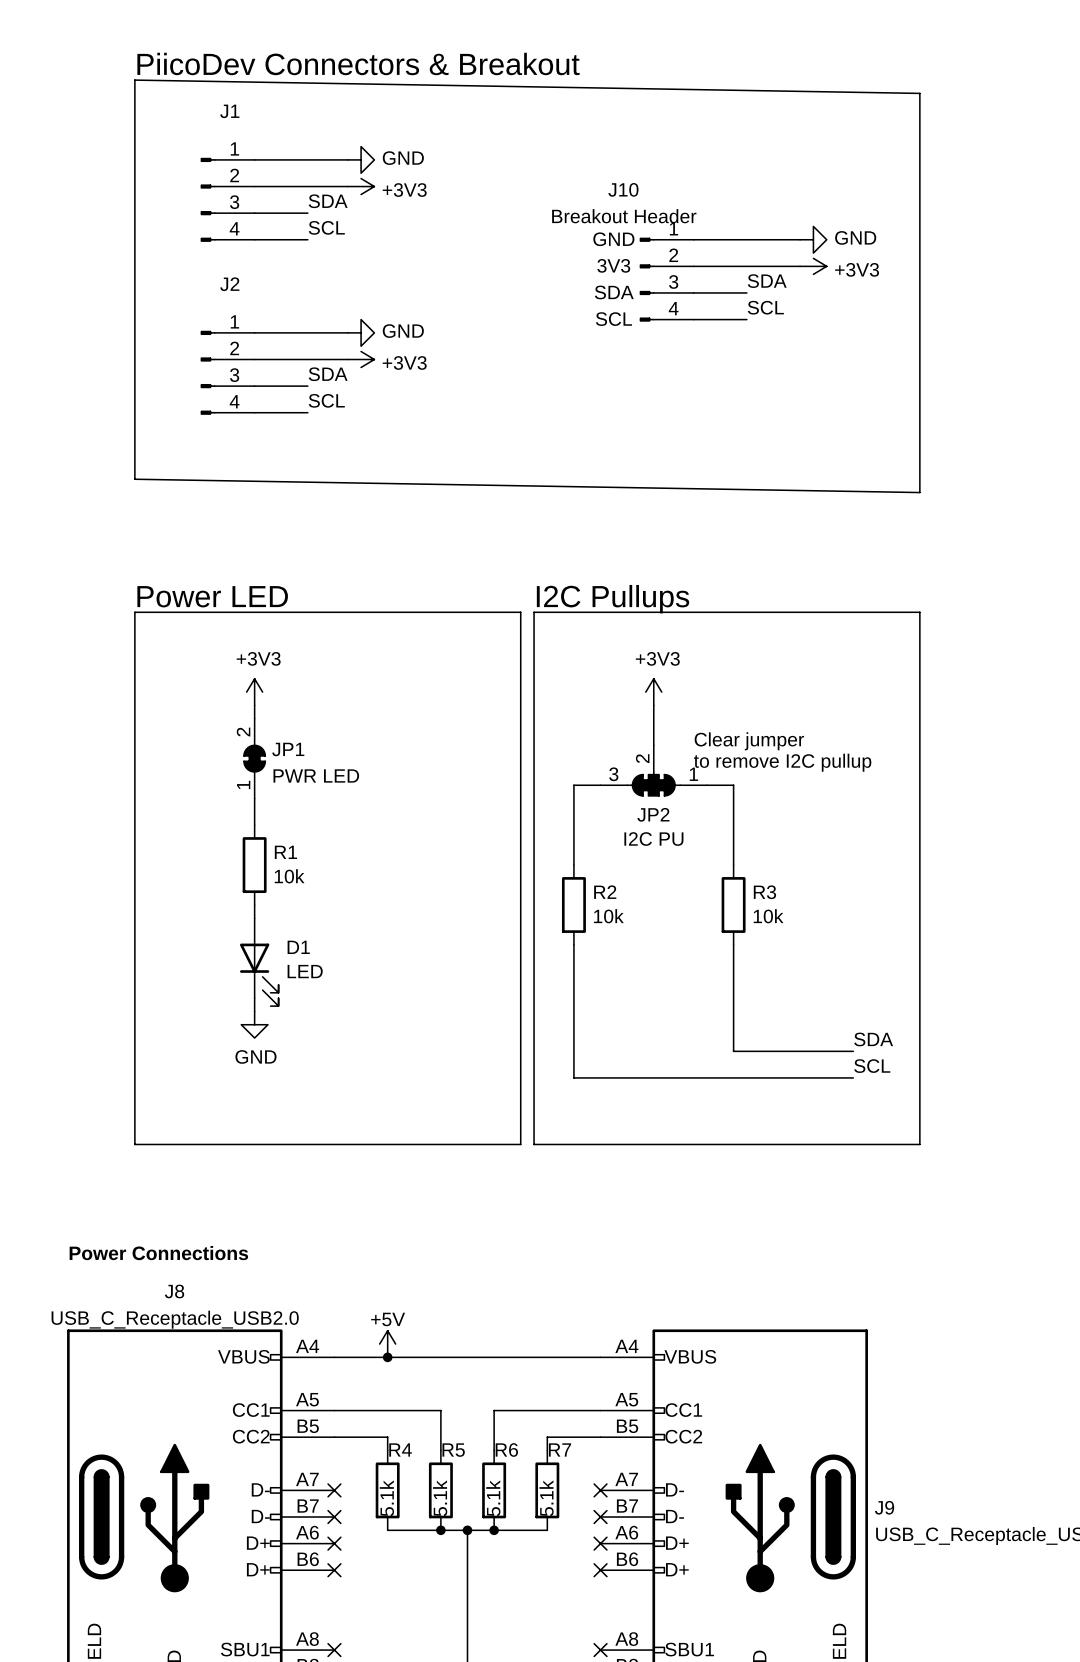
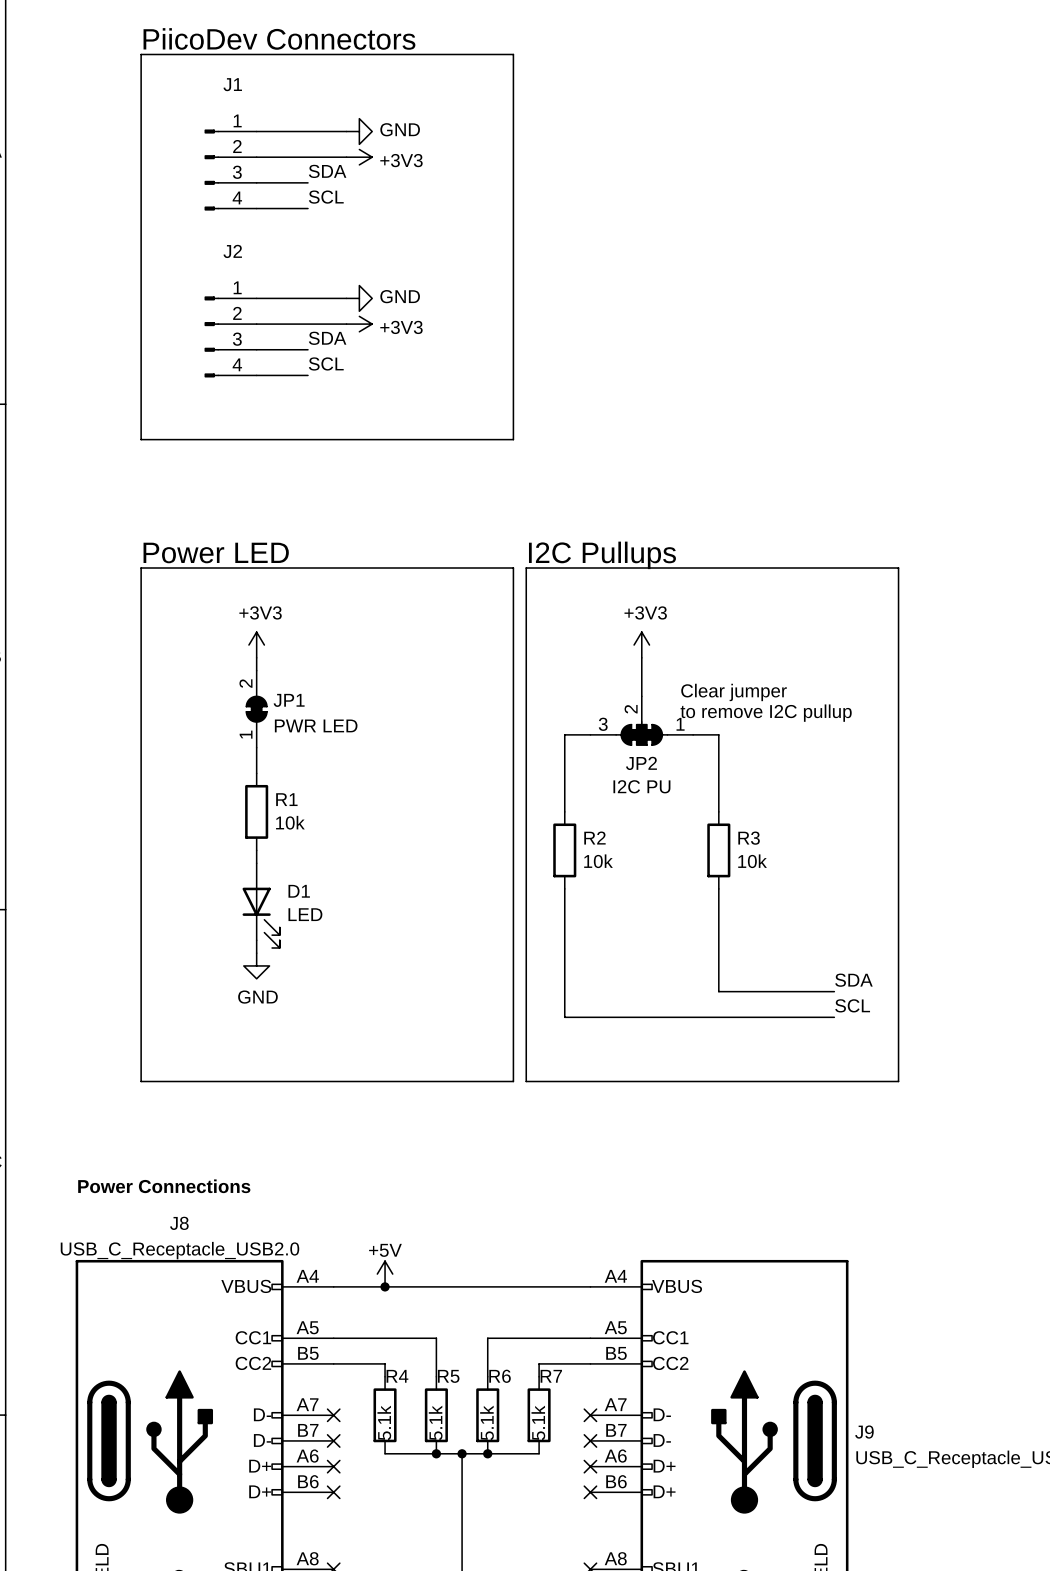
text: PiicoDev Connectors & Breakout (358, 63) -> PiicoDev Connectors (279, 38)
line: (134, 80) (919, 93) (919, 492) (134, 479) -> (141, 54) (513, 54) (513, 439) (141, 439)
wire: (693, 239) (800, 239) -> none
power symbol: GND (813, 239) -> none
wire: (693, 266) (800, 266) -> none
power symbol: +3V3 (813, 266) -> none
J10: Breakout Header (666, 279) -> none
label: SDA (767, 281) -> none
wire: (693, 292) (746, 292) -> none
label: SCL (765, 307) -> none
wire: (693, 319) (746, 319) -> none

